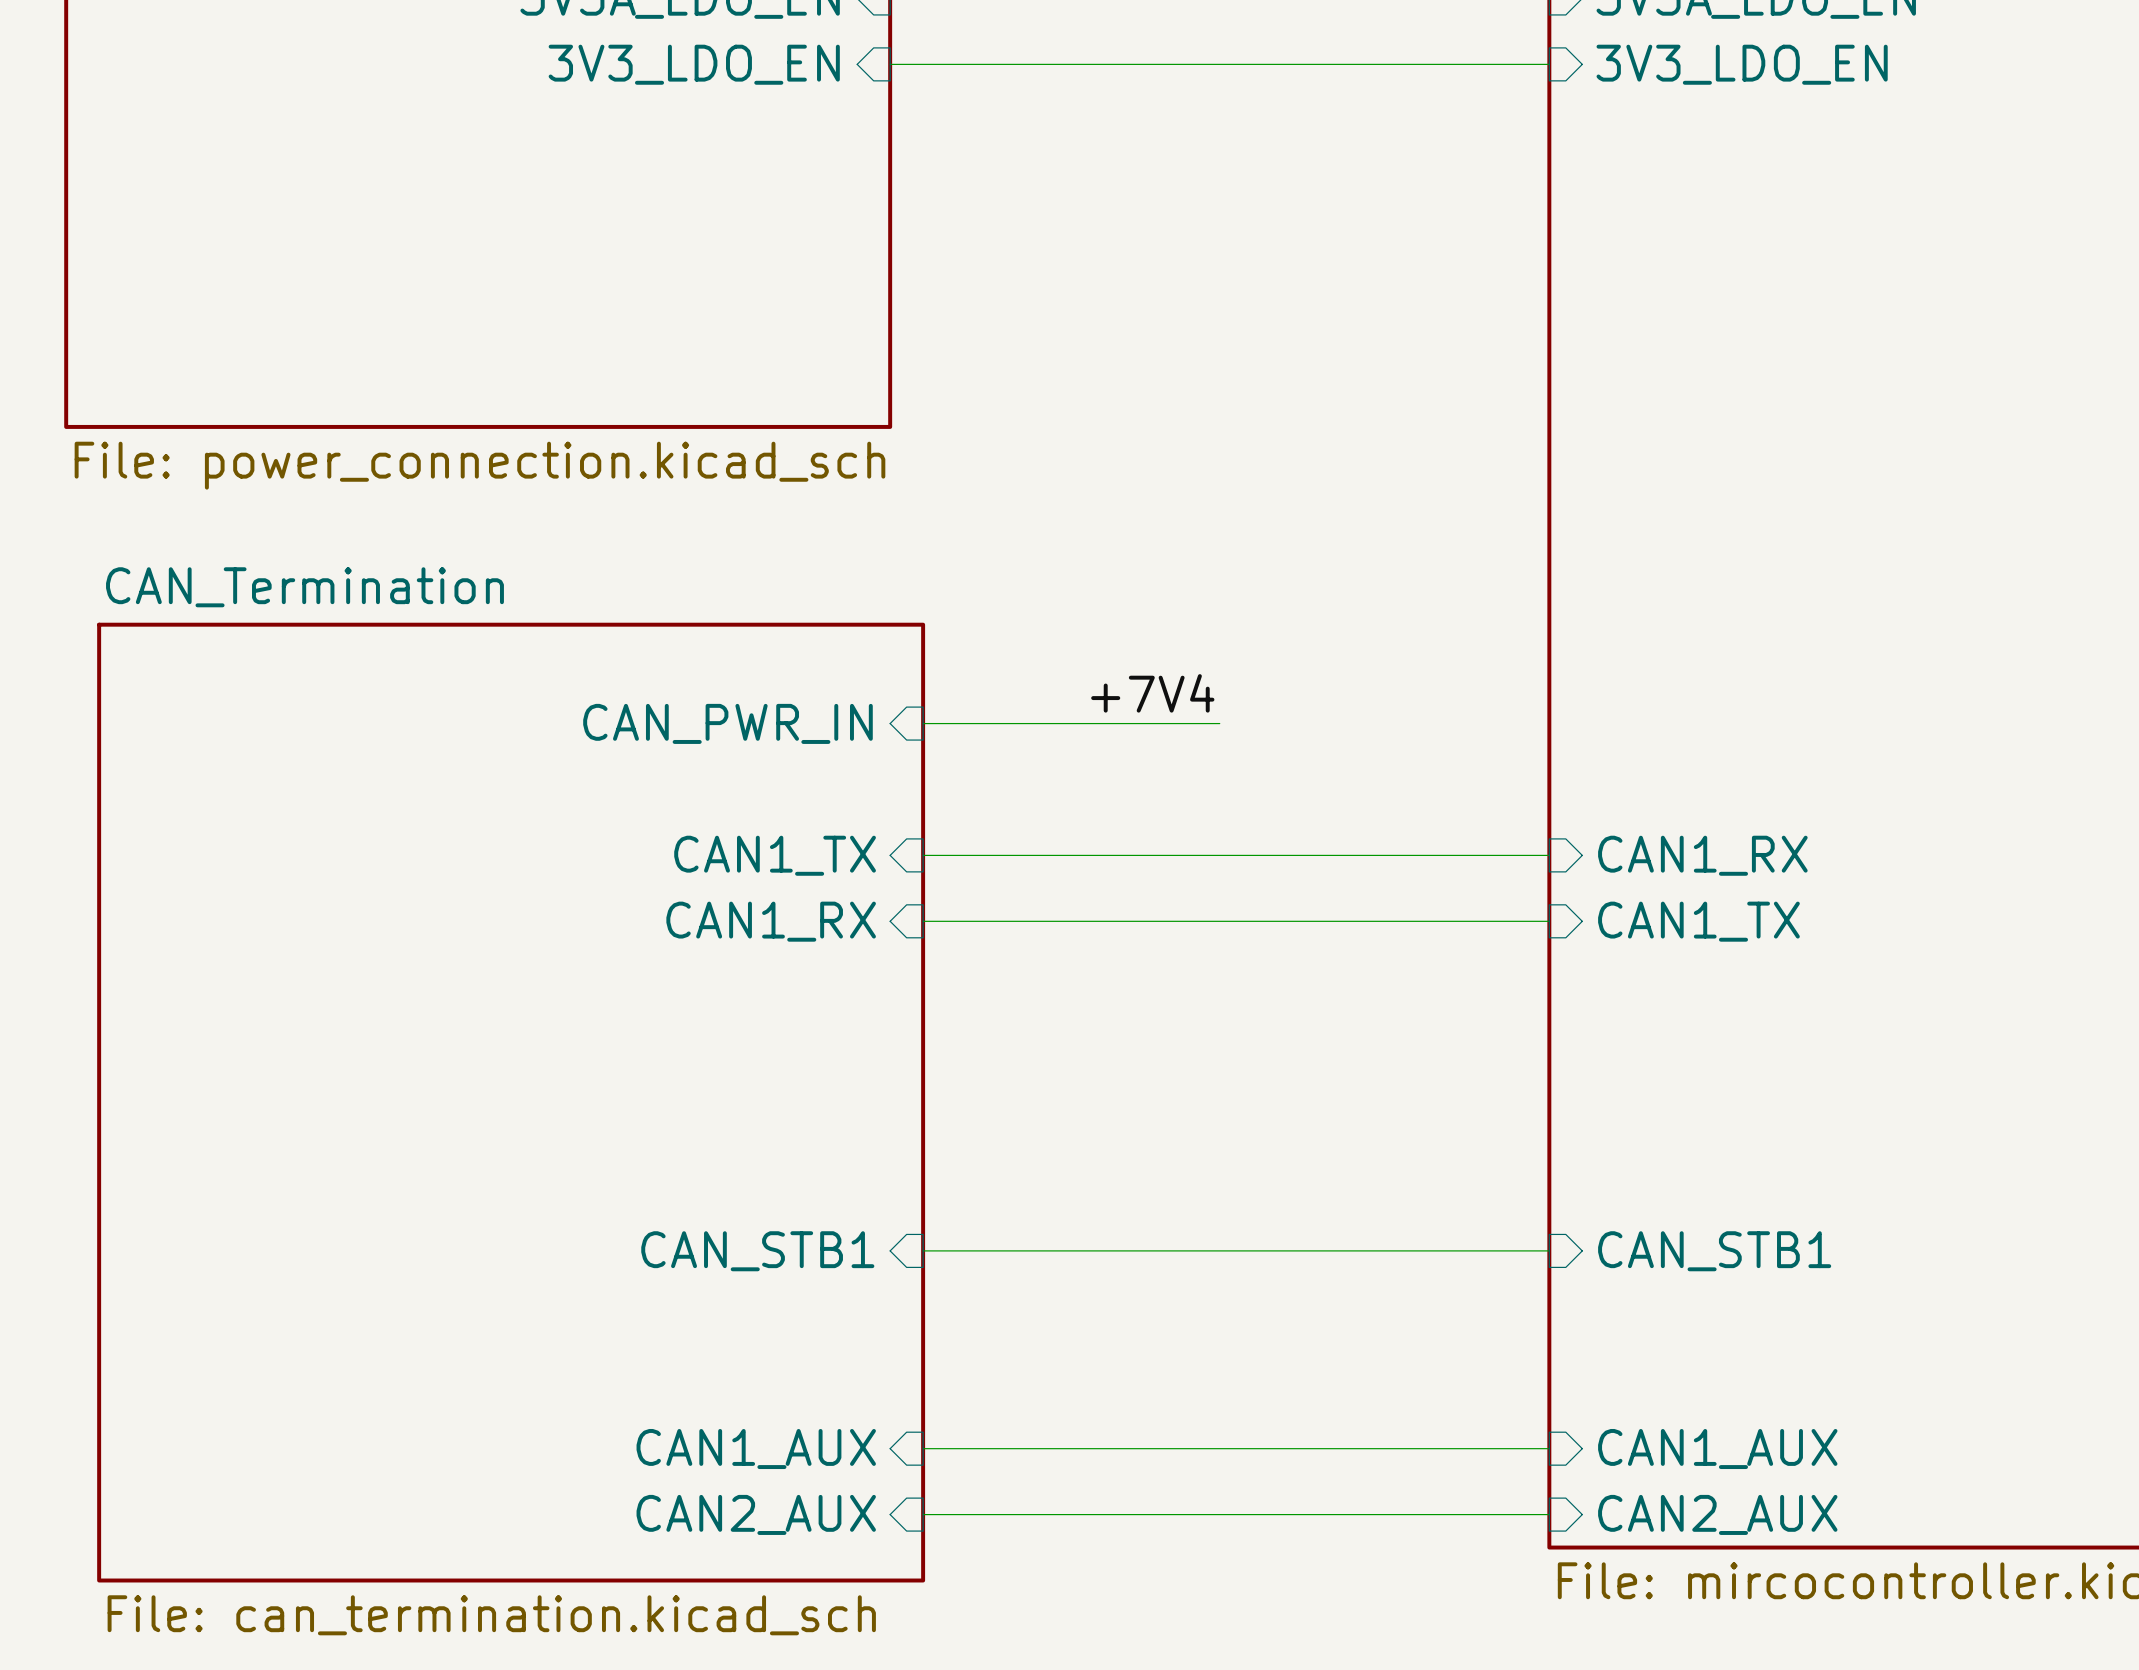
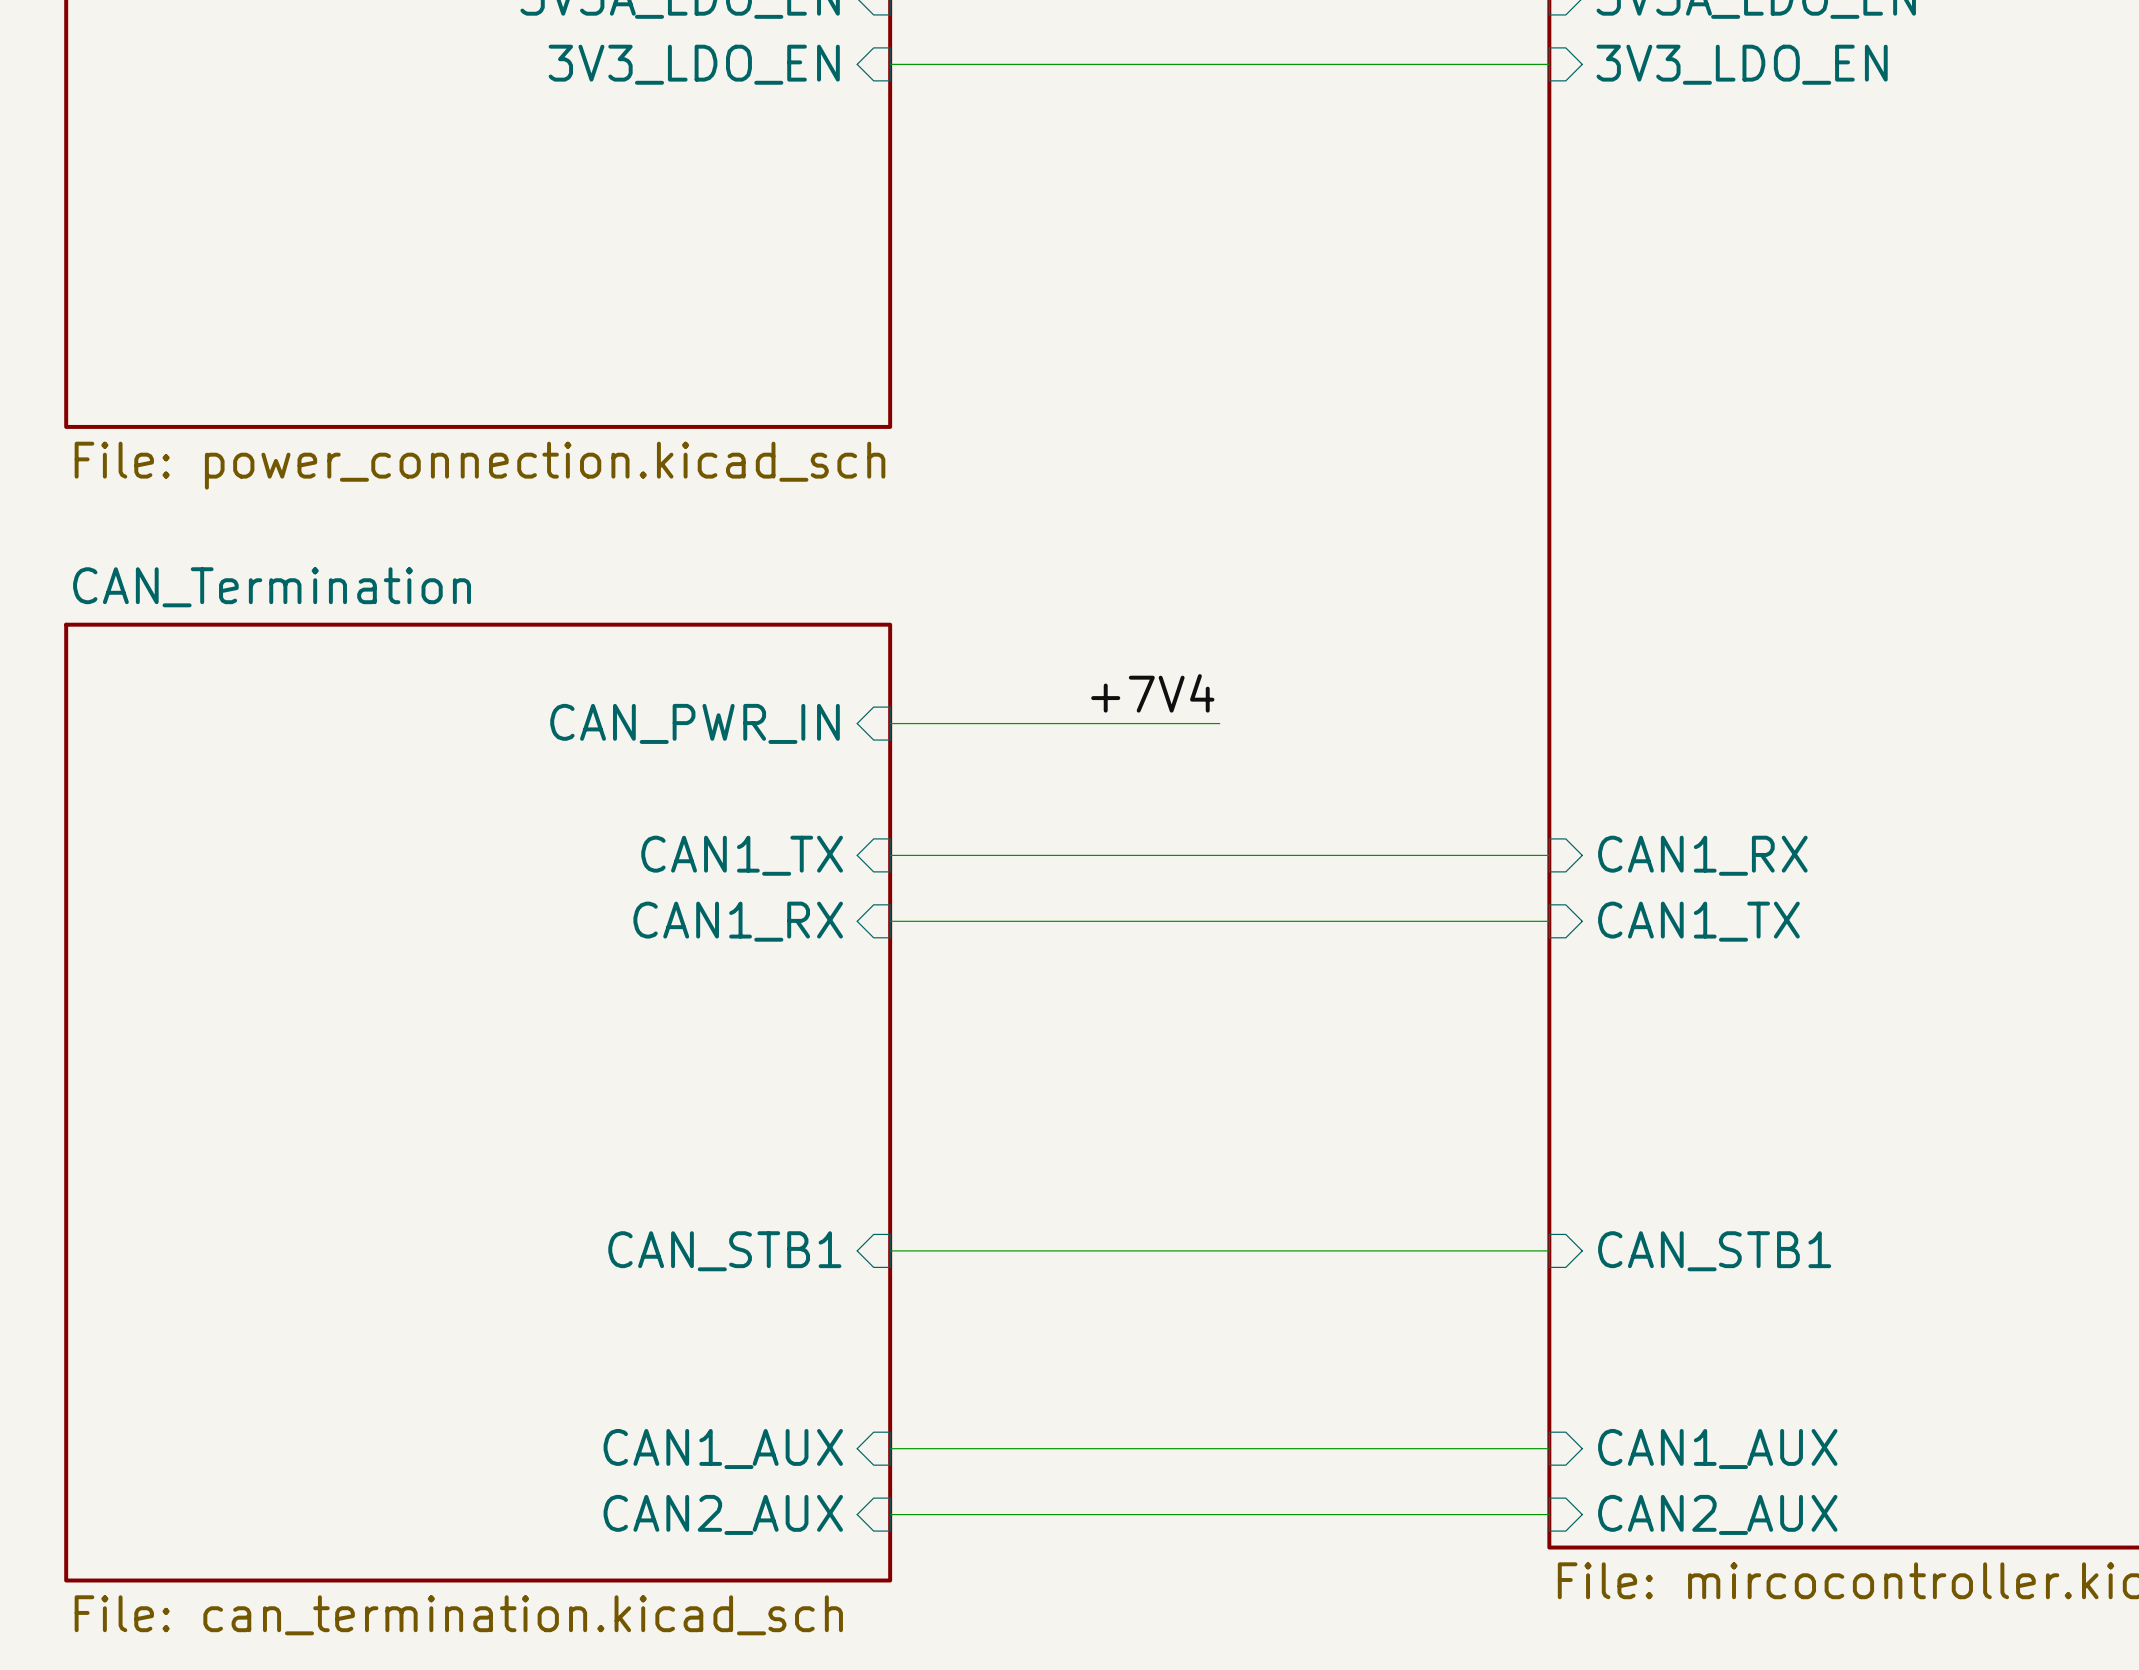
sheet pin position: CAN_PWR_IN (727, 723) -> CAN_PWR_IN (695, 723)
wire: none -> (890, 723) (923, 723)
sheet pin position: CAN1_TX (775, 855) -> CAN1_TX (742, 855)
wire: none -> (890, 855) (923, 855)
sheet pin position: CAN1_RX (771, 921) -> CAN1_RX (738, 921)
wire: none -> (890, 921) (923, 921)
sheet CAN_Termination position: (511, 1102) -> (478, 1102)
wire: none -> (890, 1250) (923, 1250)
sheet pin position: CAN_STB1 (757, 1251) -> CAN_STB1 (724, 1251)
wire: none -> (890, 1448) (923, 1448)
sheet pin position: CAN1_AUX (756, 1449) -> CAN1_AUX (723, 1449)
sheet pin position: CAN2_AUX (756, 1514) -> CAN2_AUX (723, 1514)
wire: none -> (890, 1514) (923, 1514)

